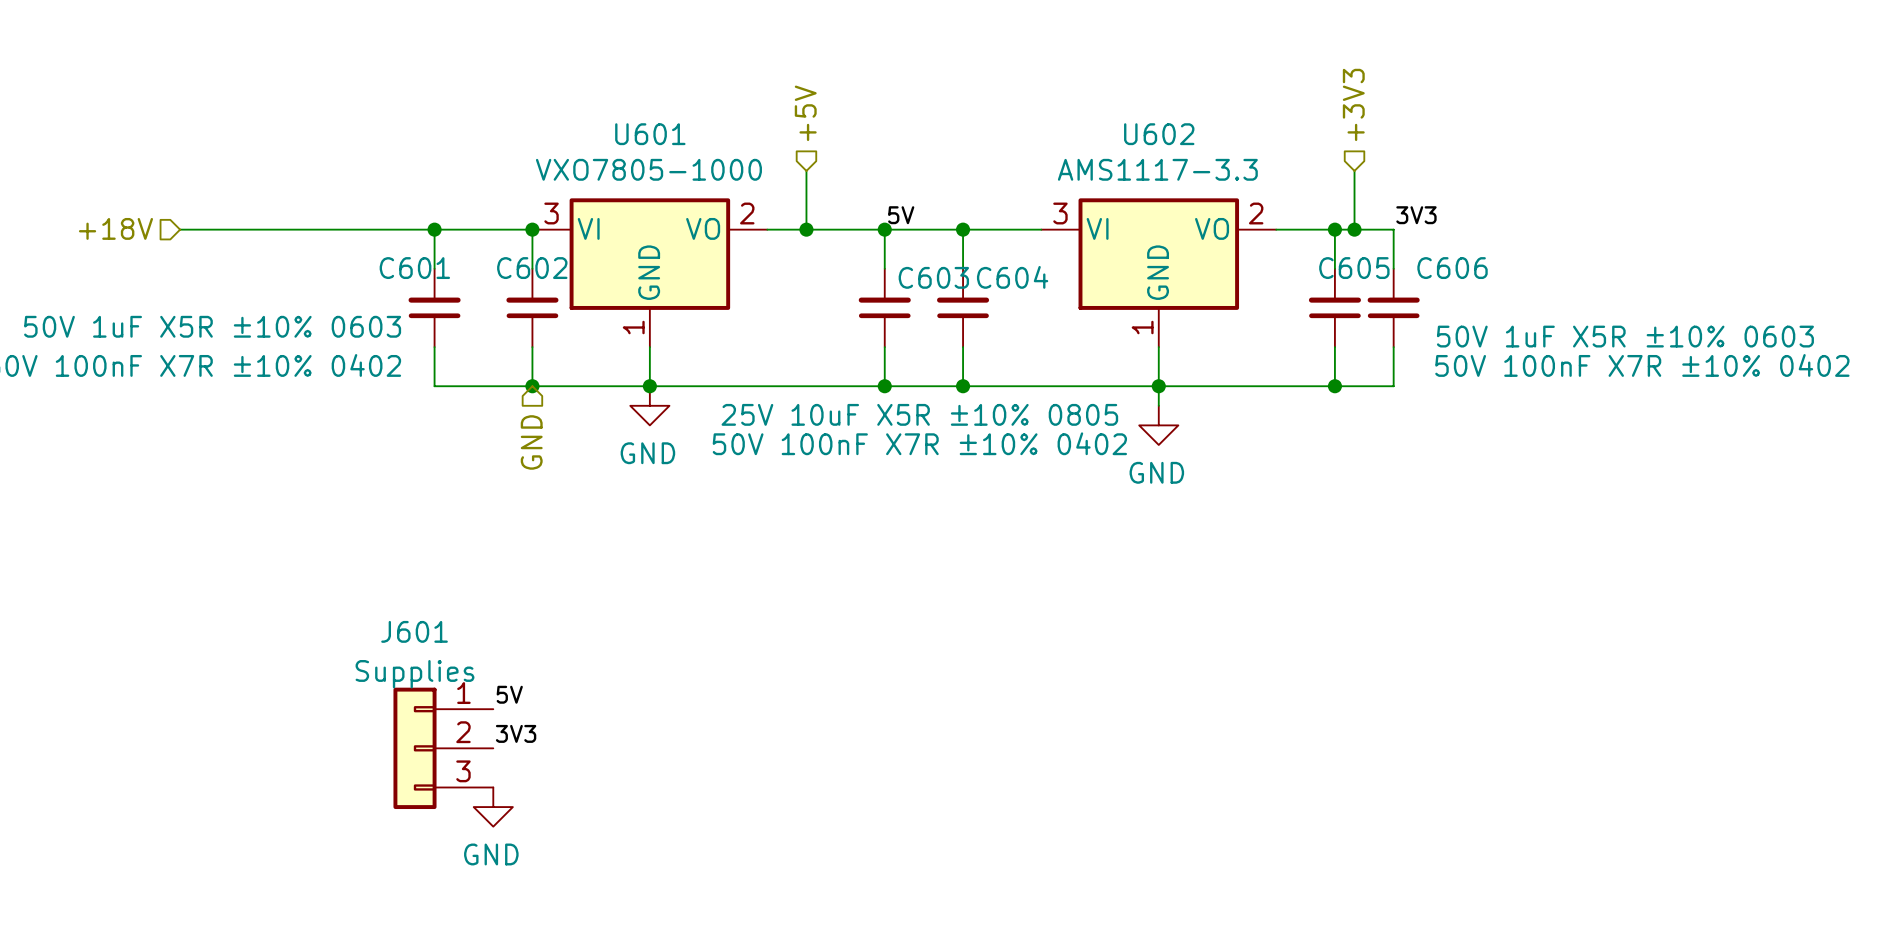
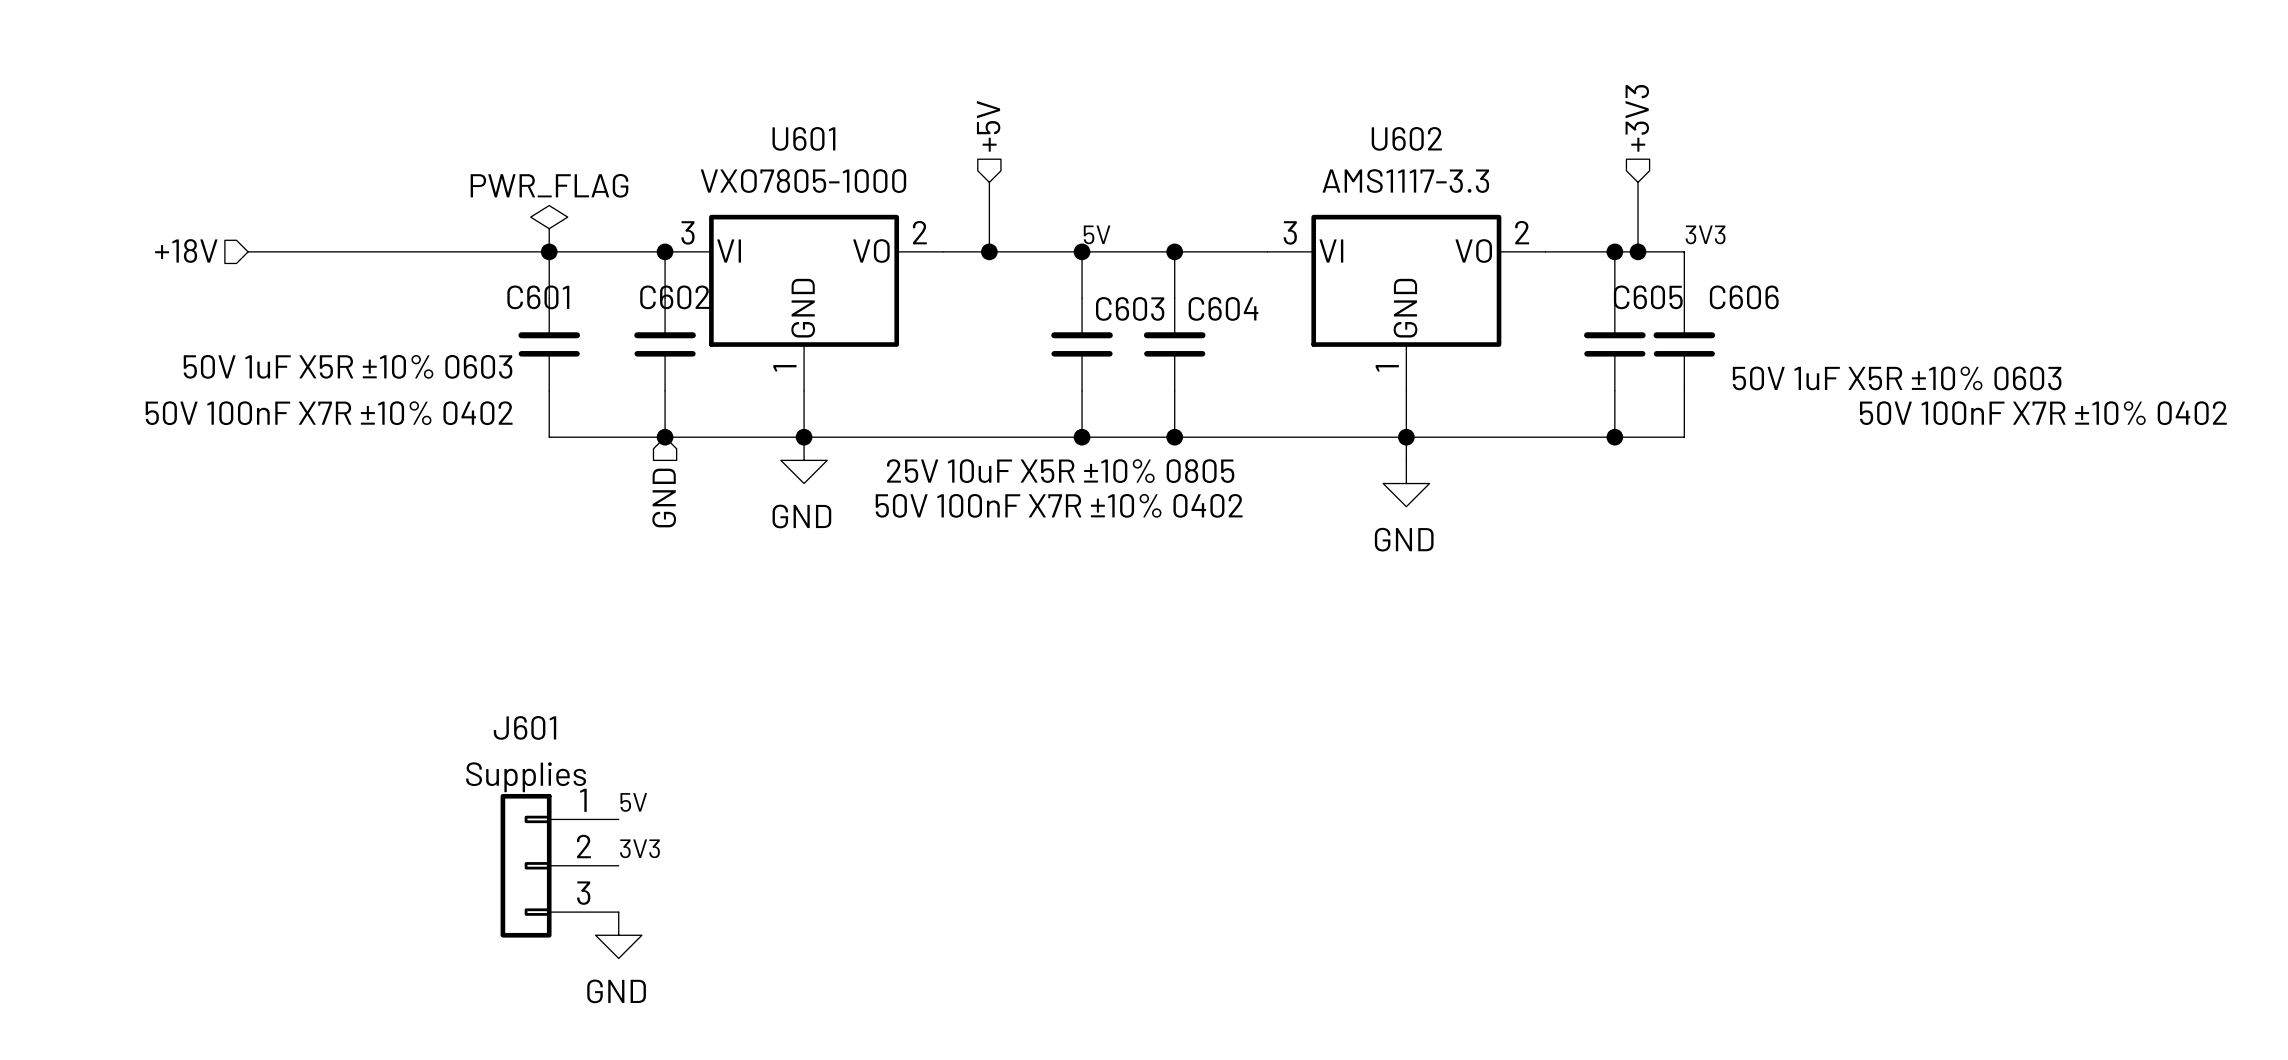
power symbol: none -> PWR_FLAG (549, 228)

